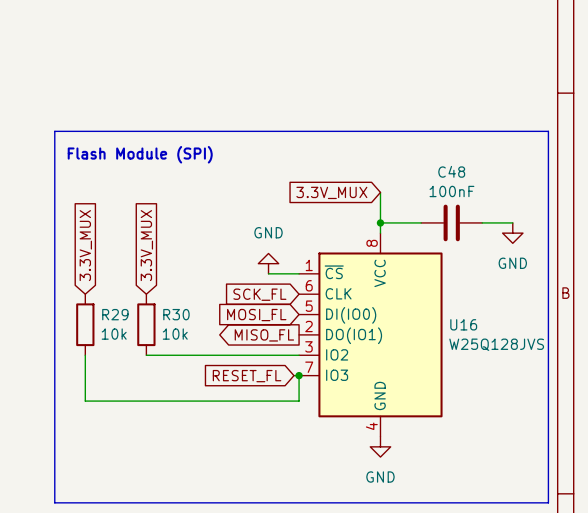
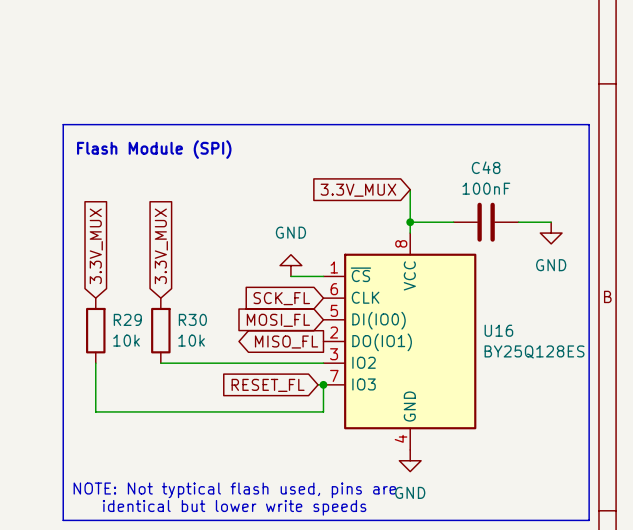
U16 value: W25Q128JVS (496, 344) -> BY25Q128ES (534, 351)
text: none -> NOTE: Not typtical flash used, pins are (234, 490)
text: none -> identical but lower write speeds (234, 507)

